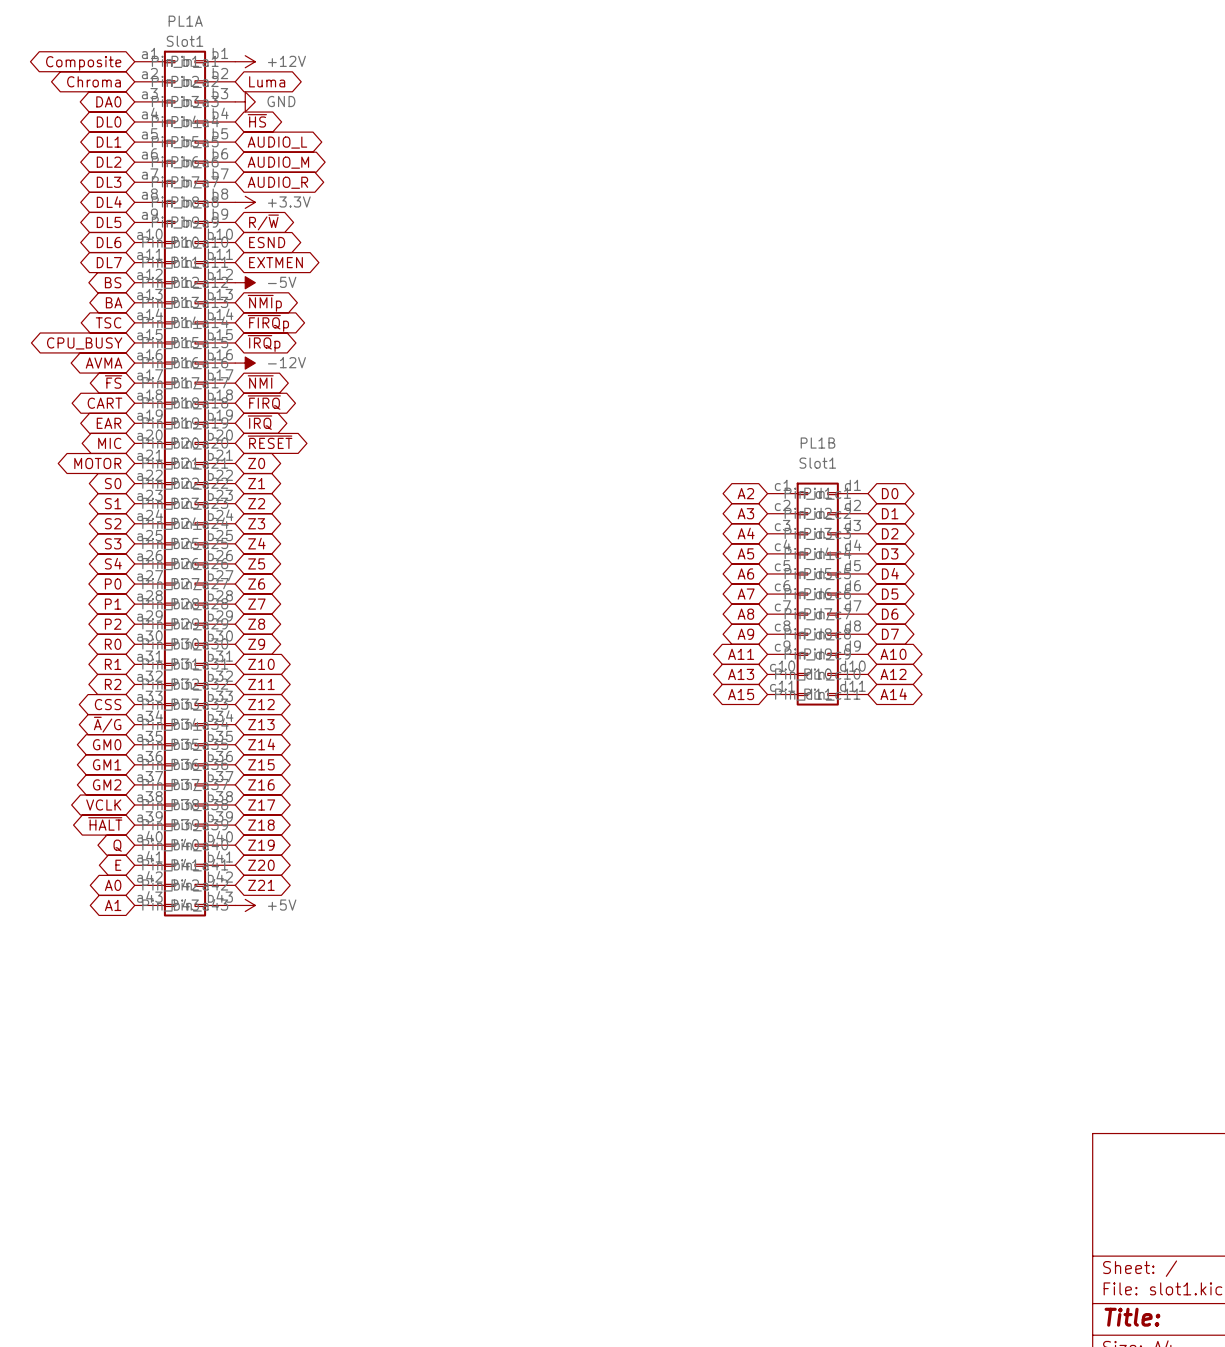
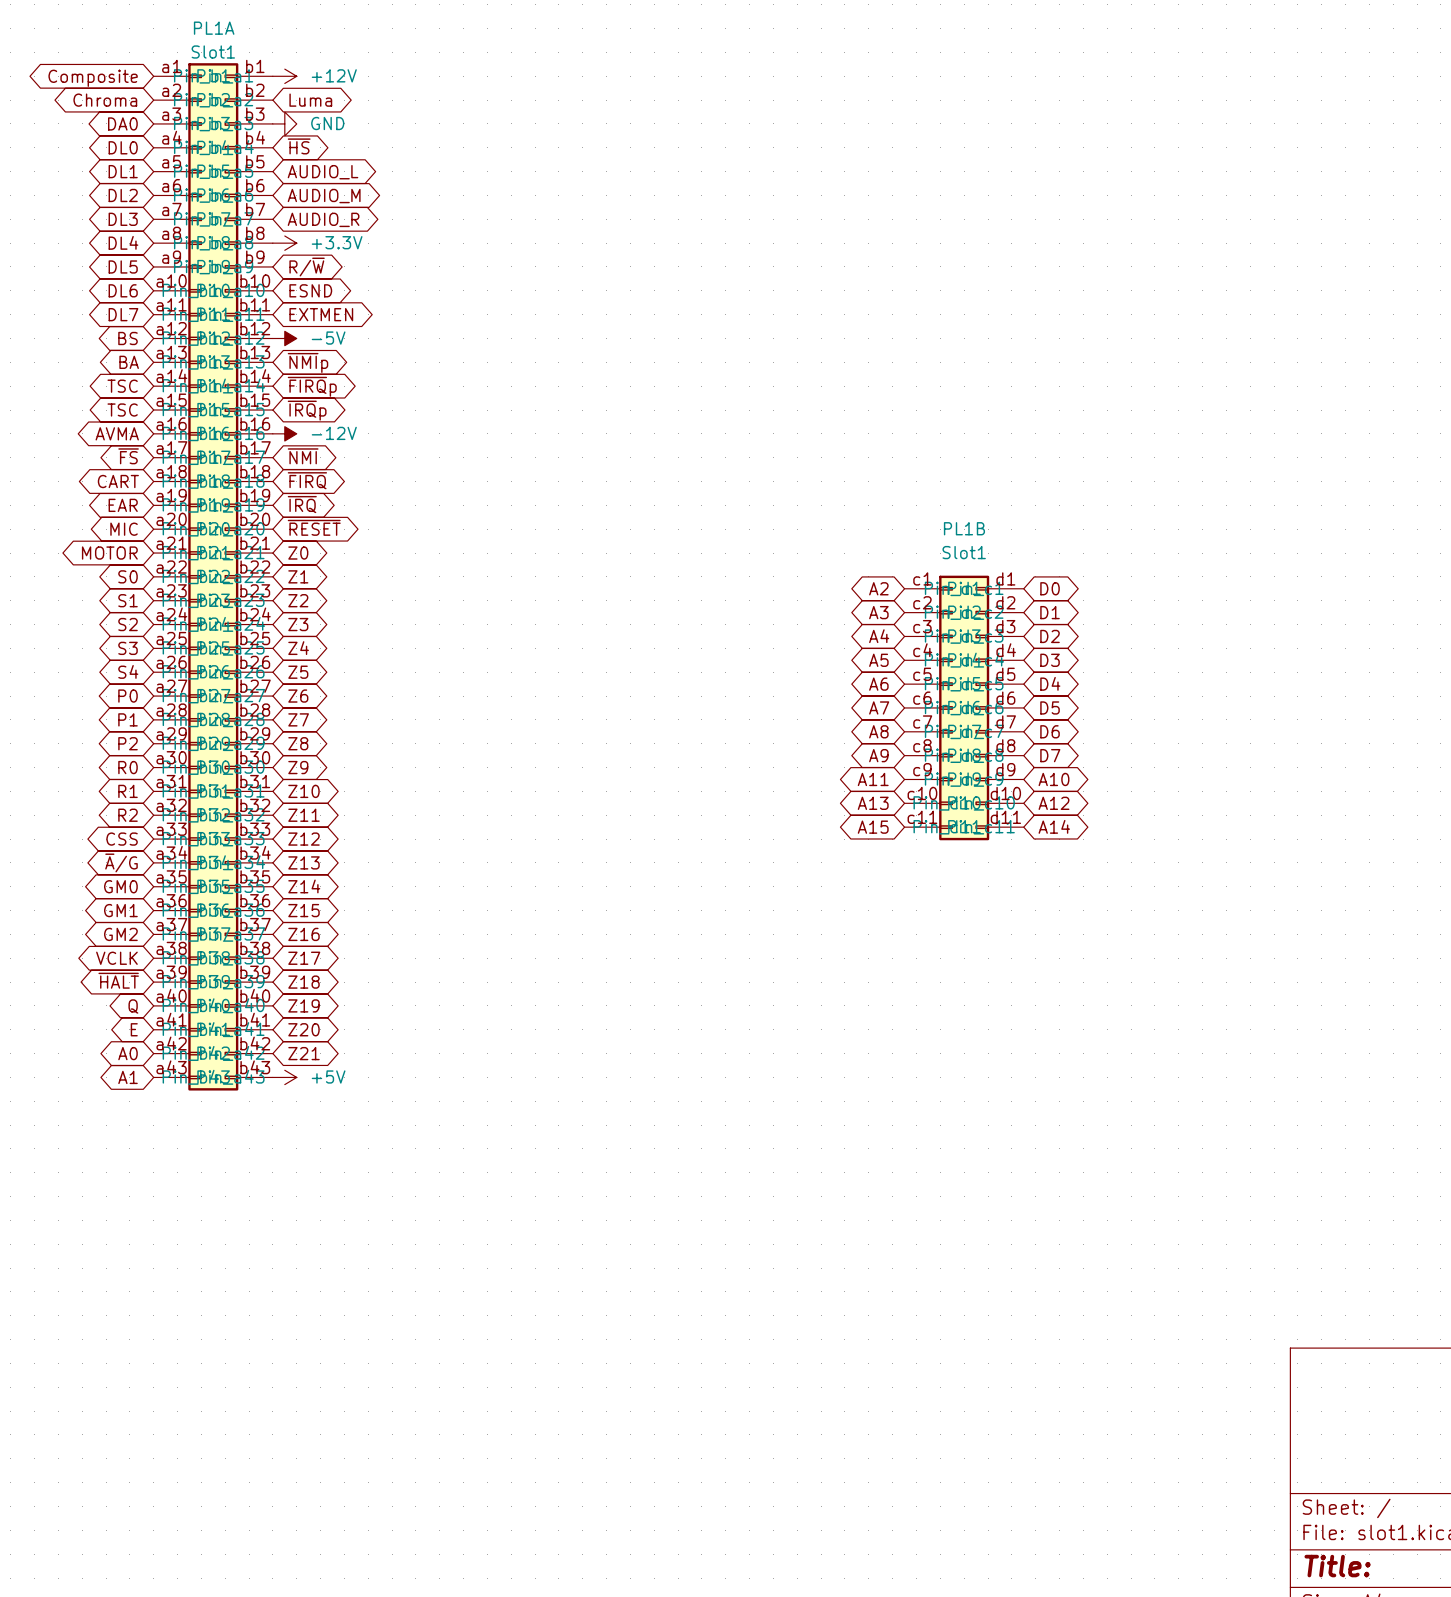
global label: CPU_BUSY (84, 343) -> TSC (122, 410)

